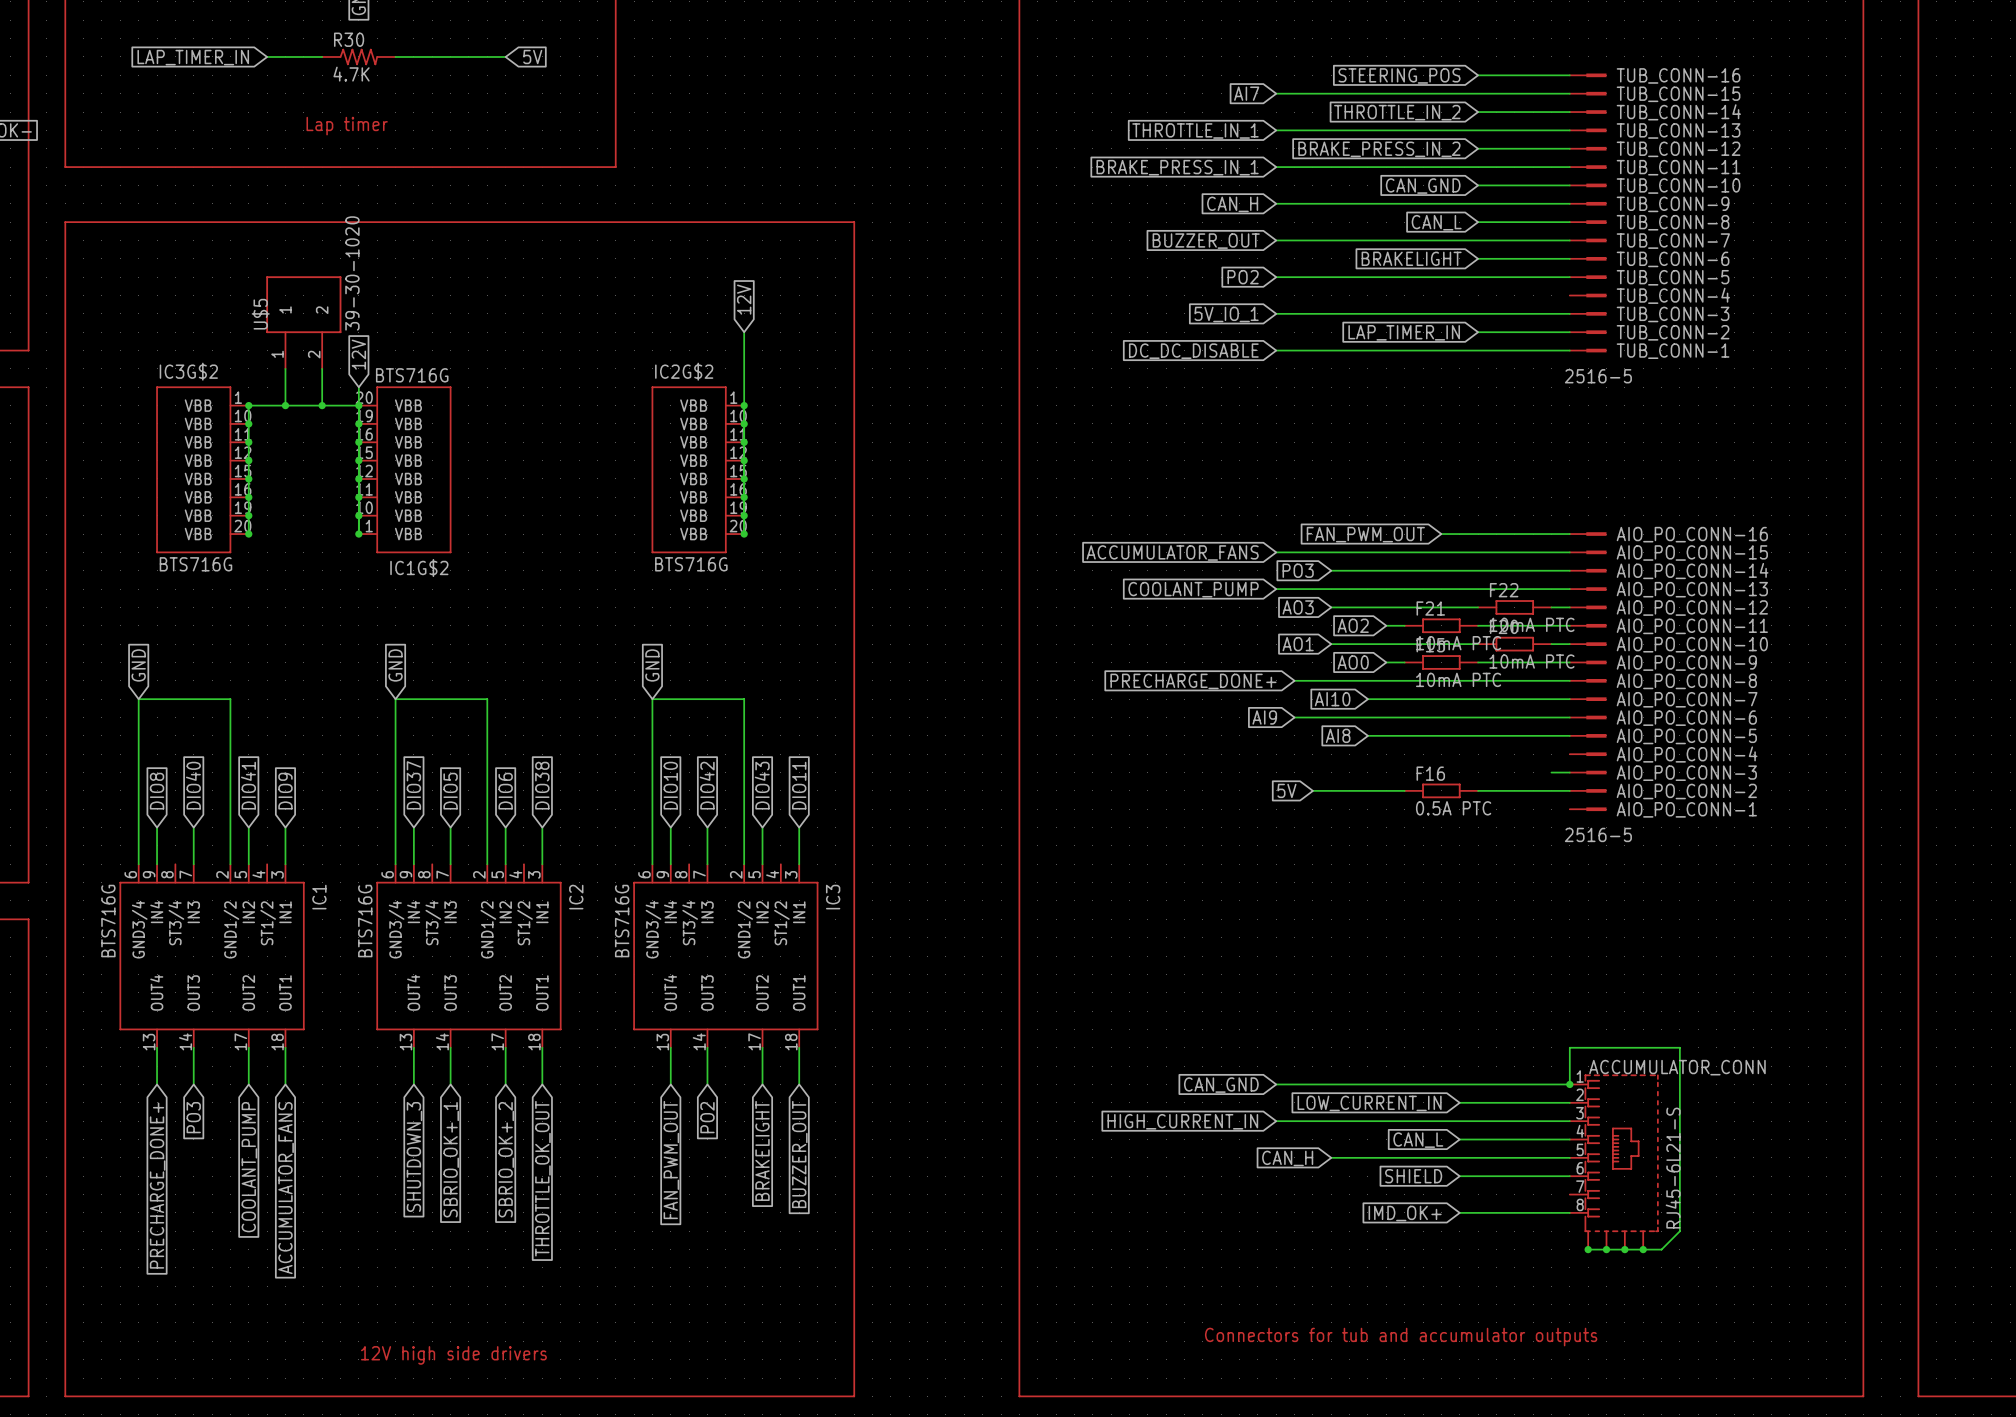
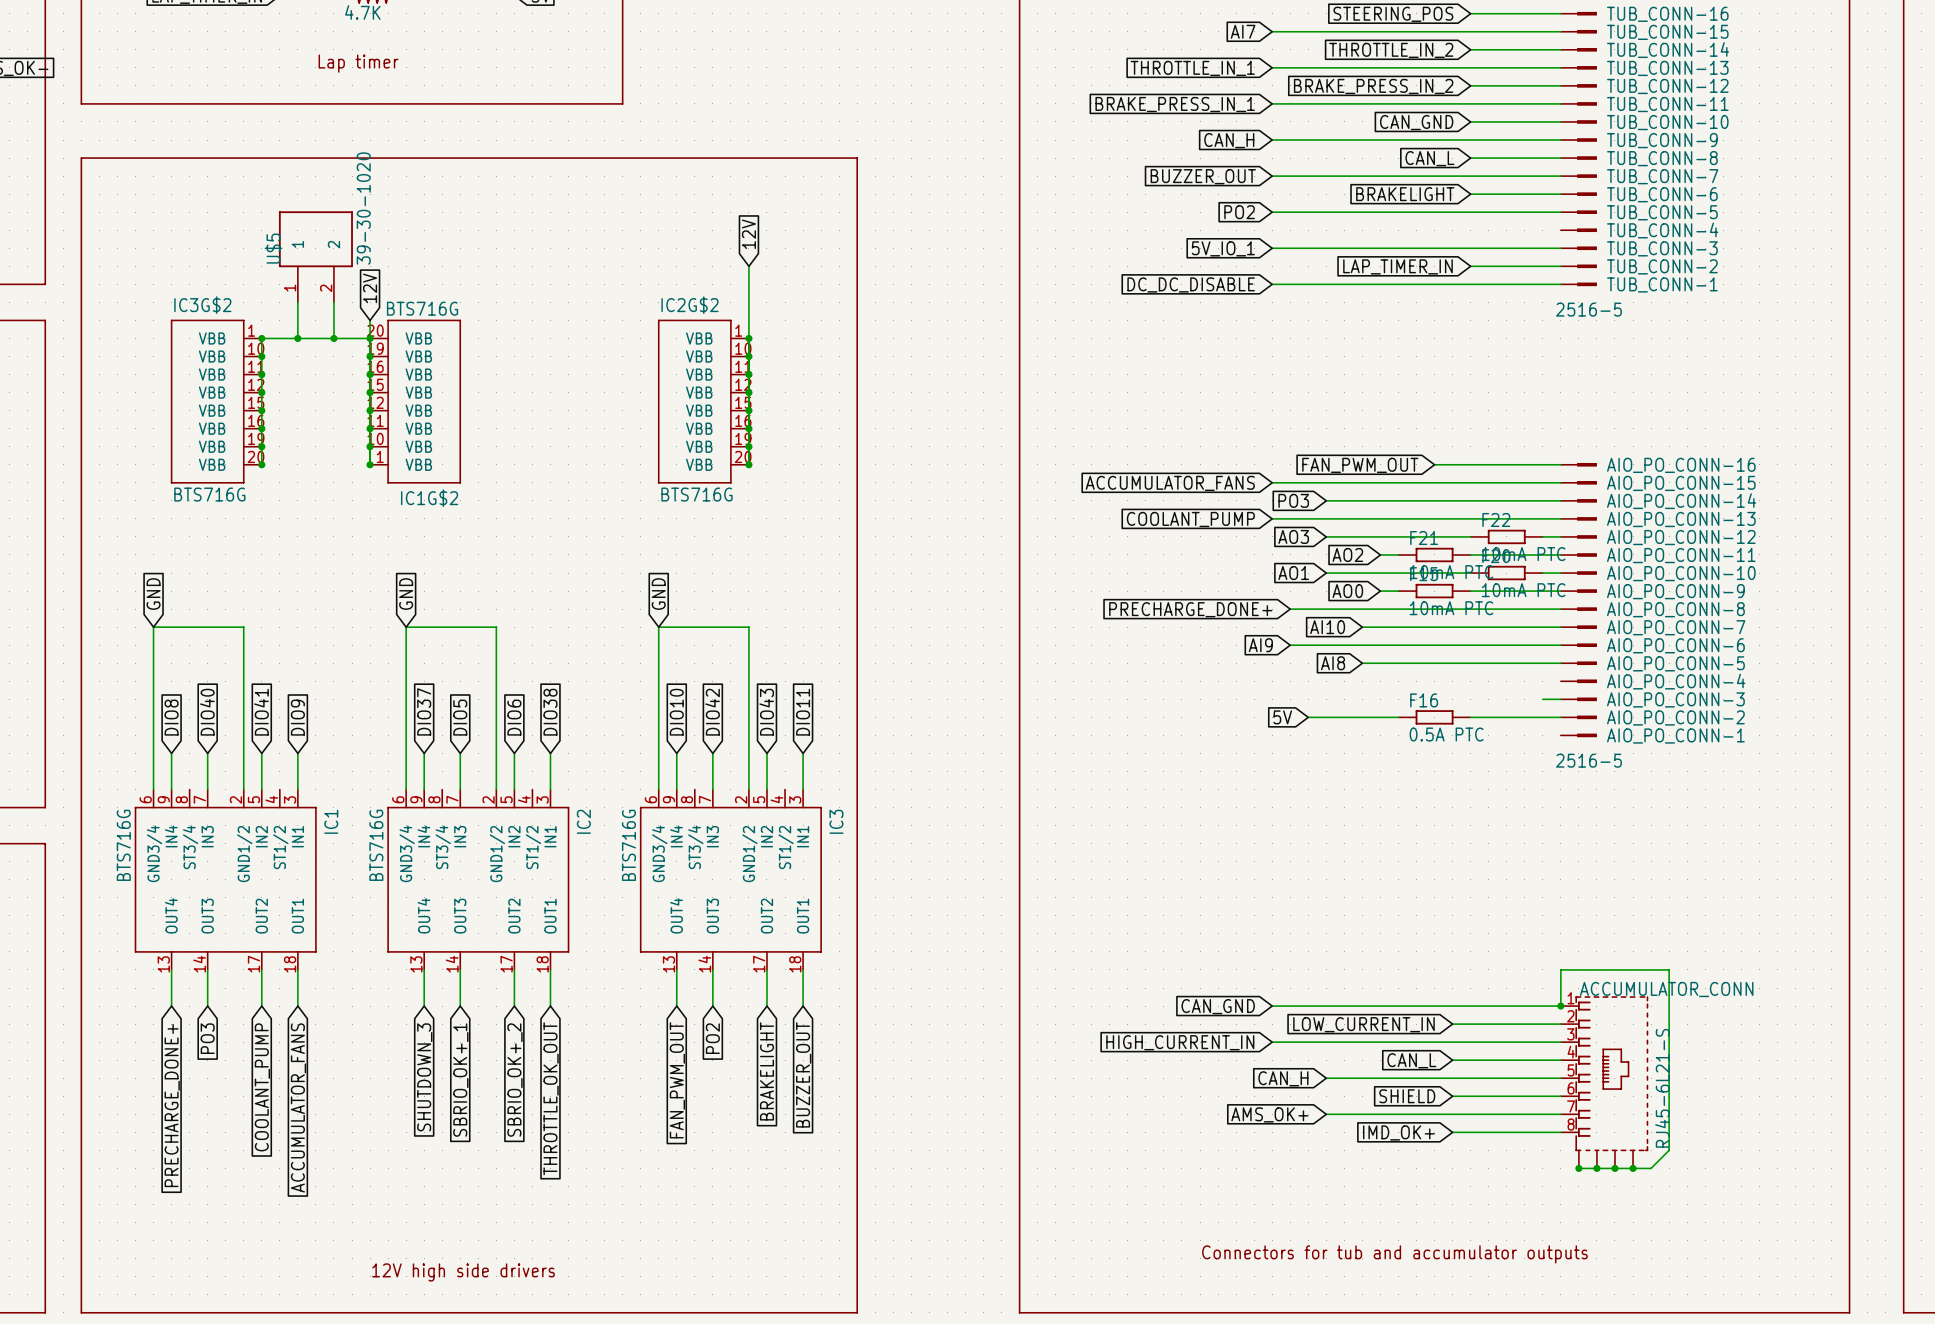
wire: none -> (1326, 1114) (1560, 1114)
global label: none -> AMS_OK+ (1269, 1114)

